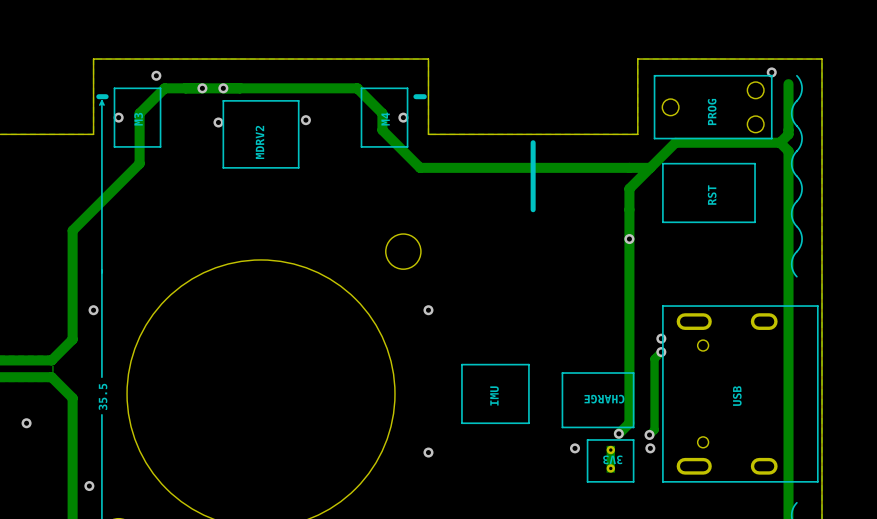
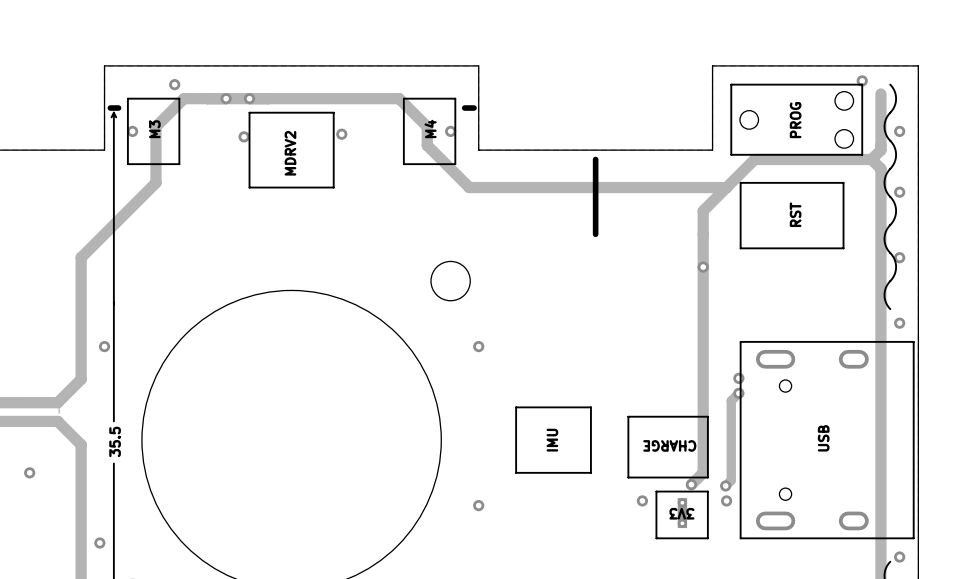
via: none -> (899, 131)
via: none -> (899, 192)
via: none -> (899, 257)
via: none -> (899, 323)
via: none -> (899, 557)

